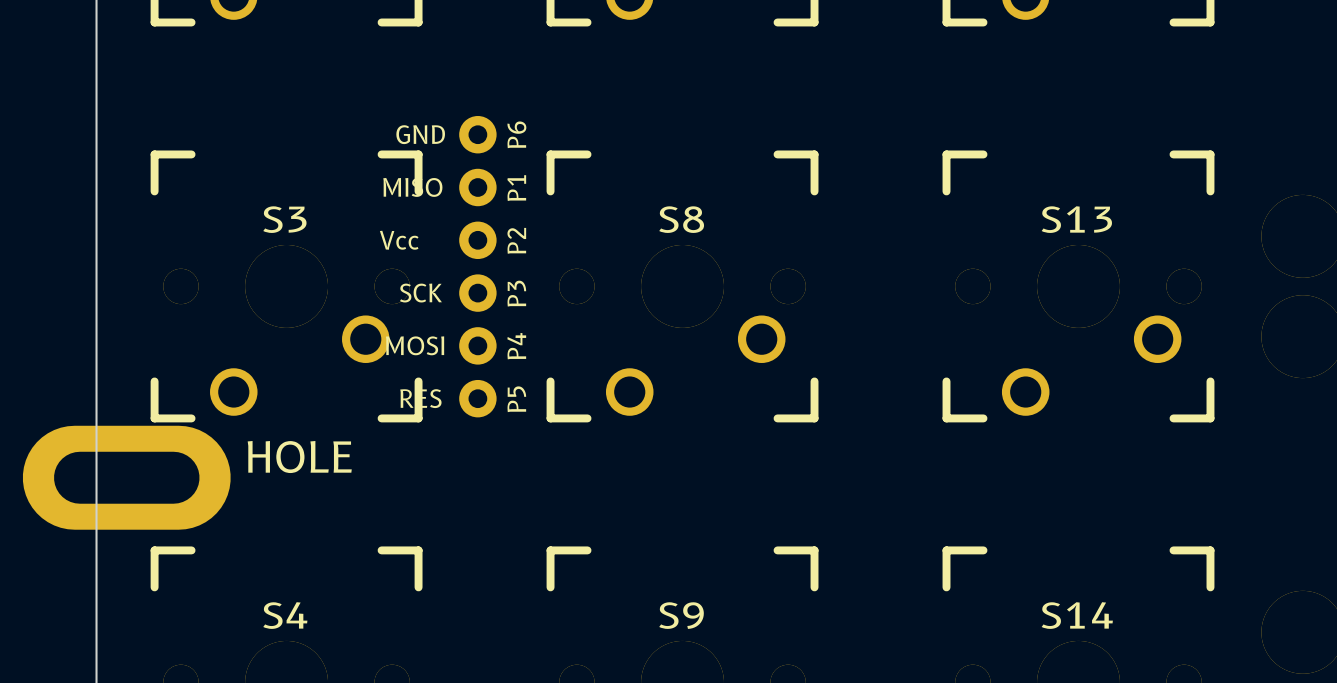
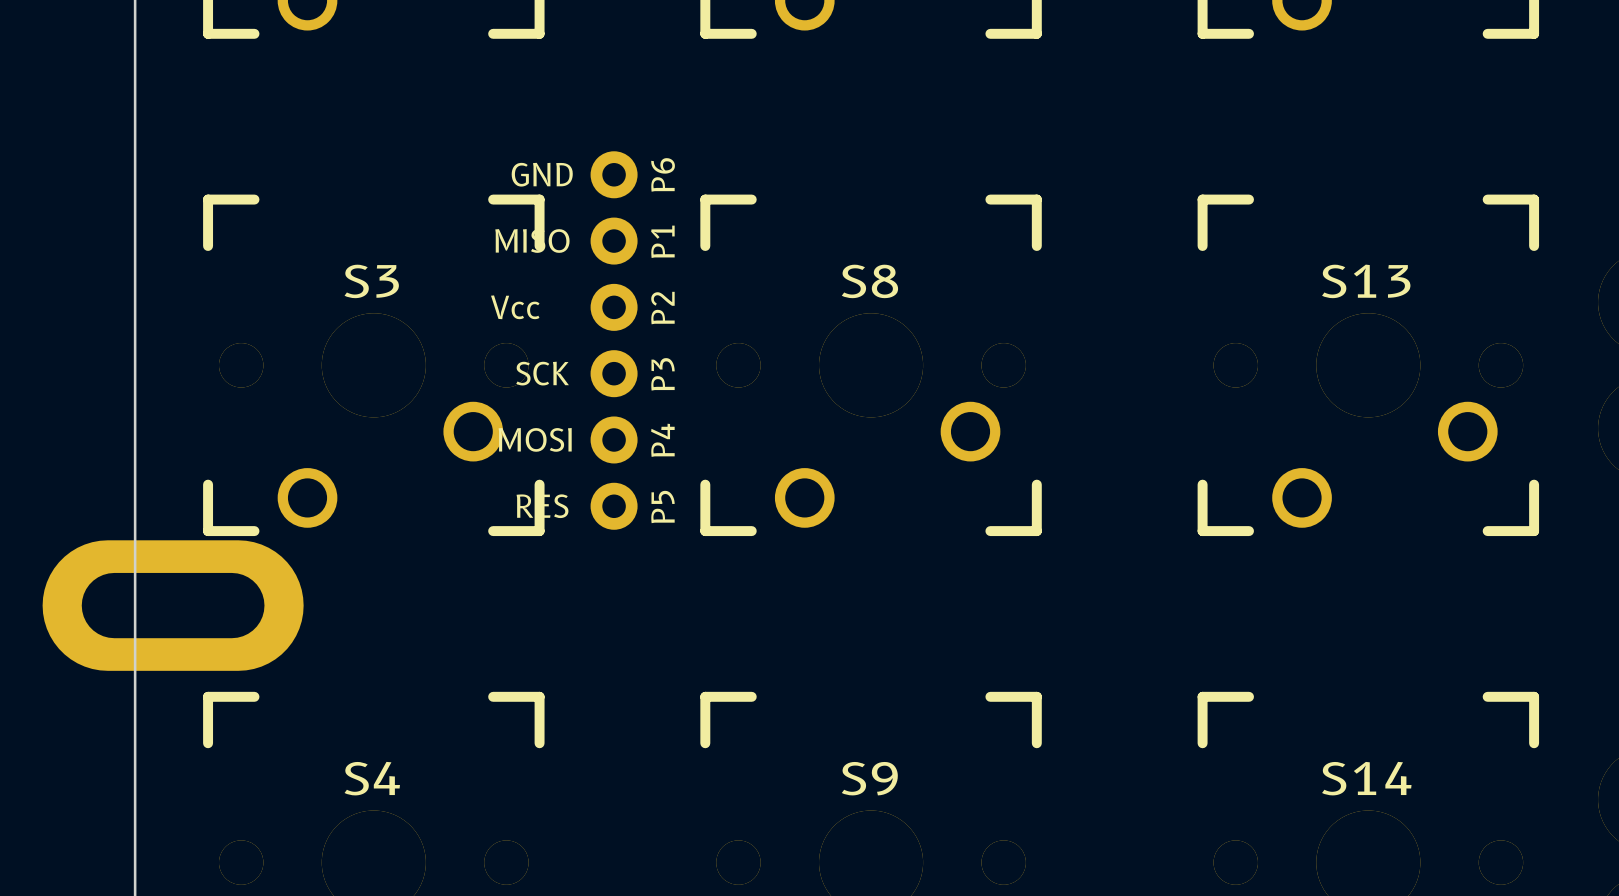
part value: HOLE (299, 457) -> none

